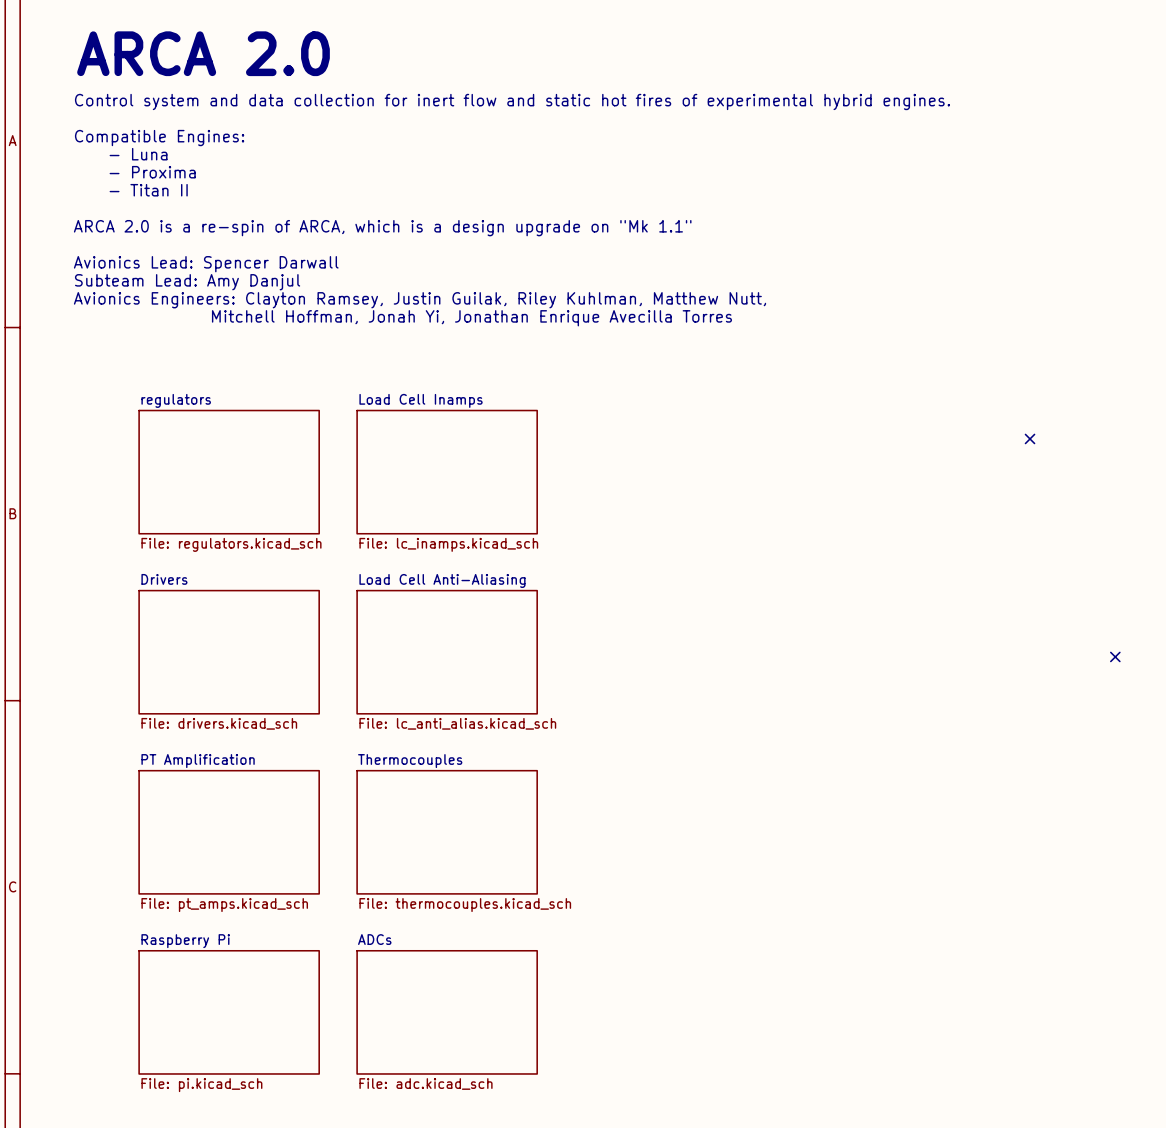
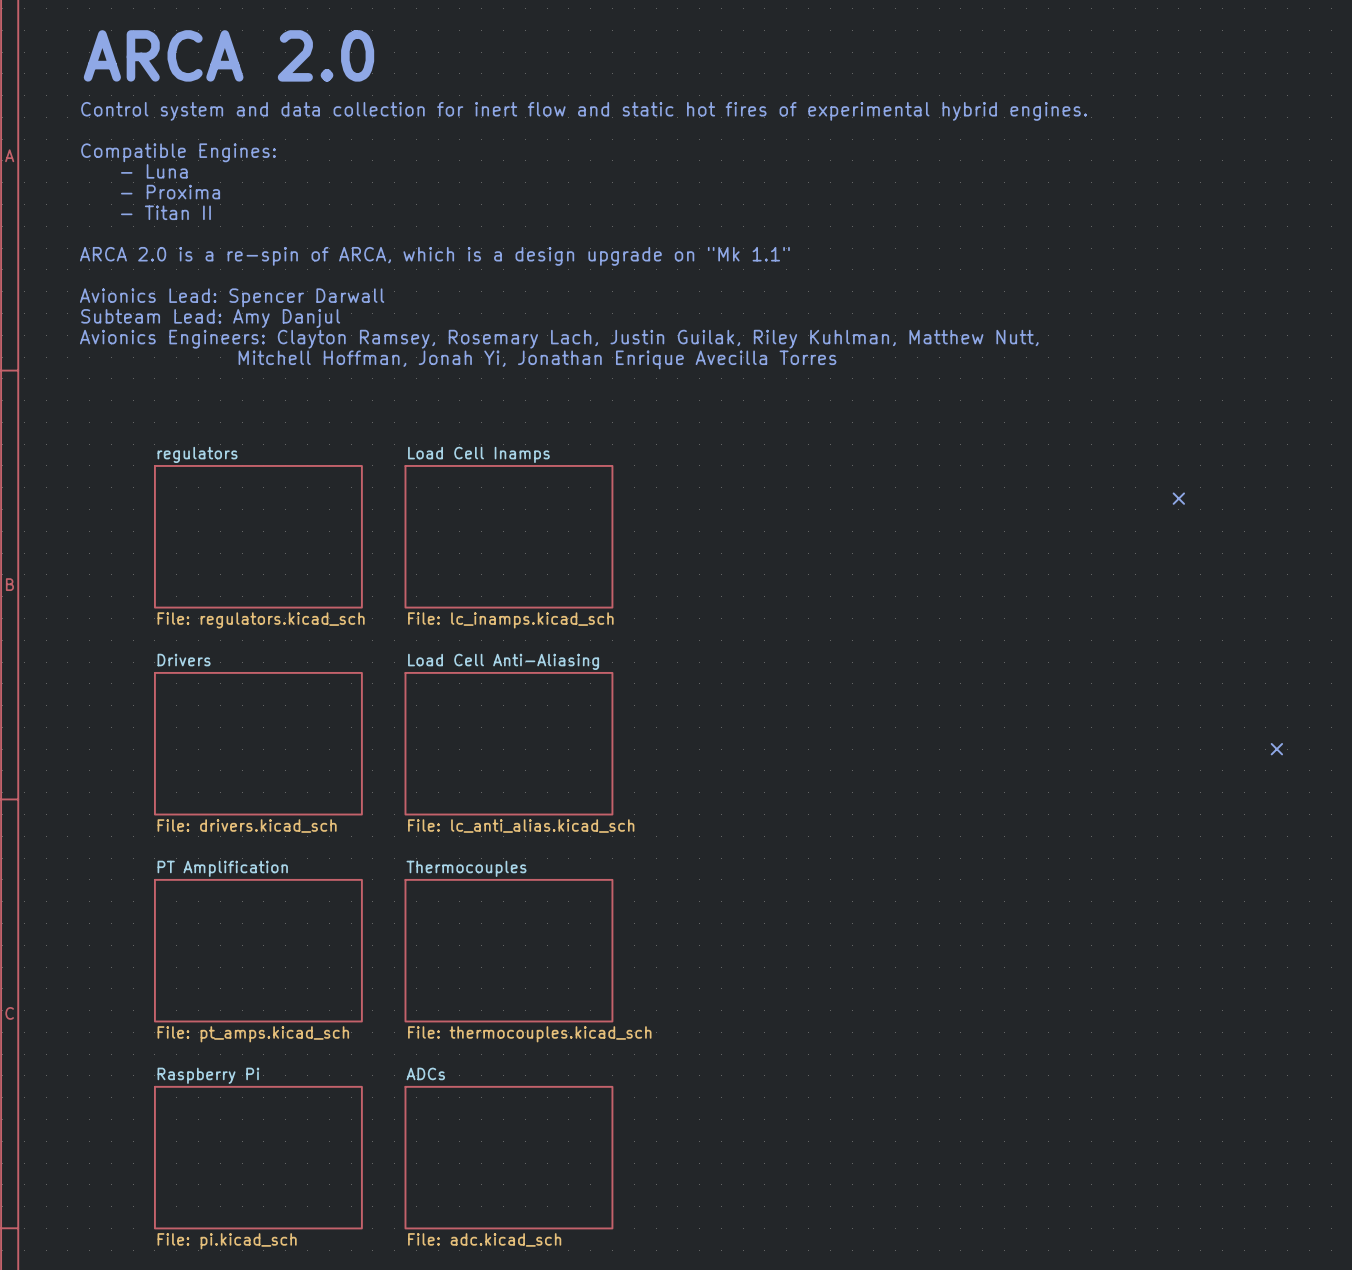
text: Avionics Engineers: Clayton Ramsey, Justin Guilak, Riley Kuhlman, Matthew Nutt, (419, 300) -> Avionics Engineers: Clayton Ramsey, Rosemary Lach, Justin Guilak, Riley Kuhlman, Matthew Nutt, (559, 339)

